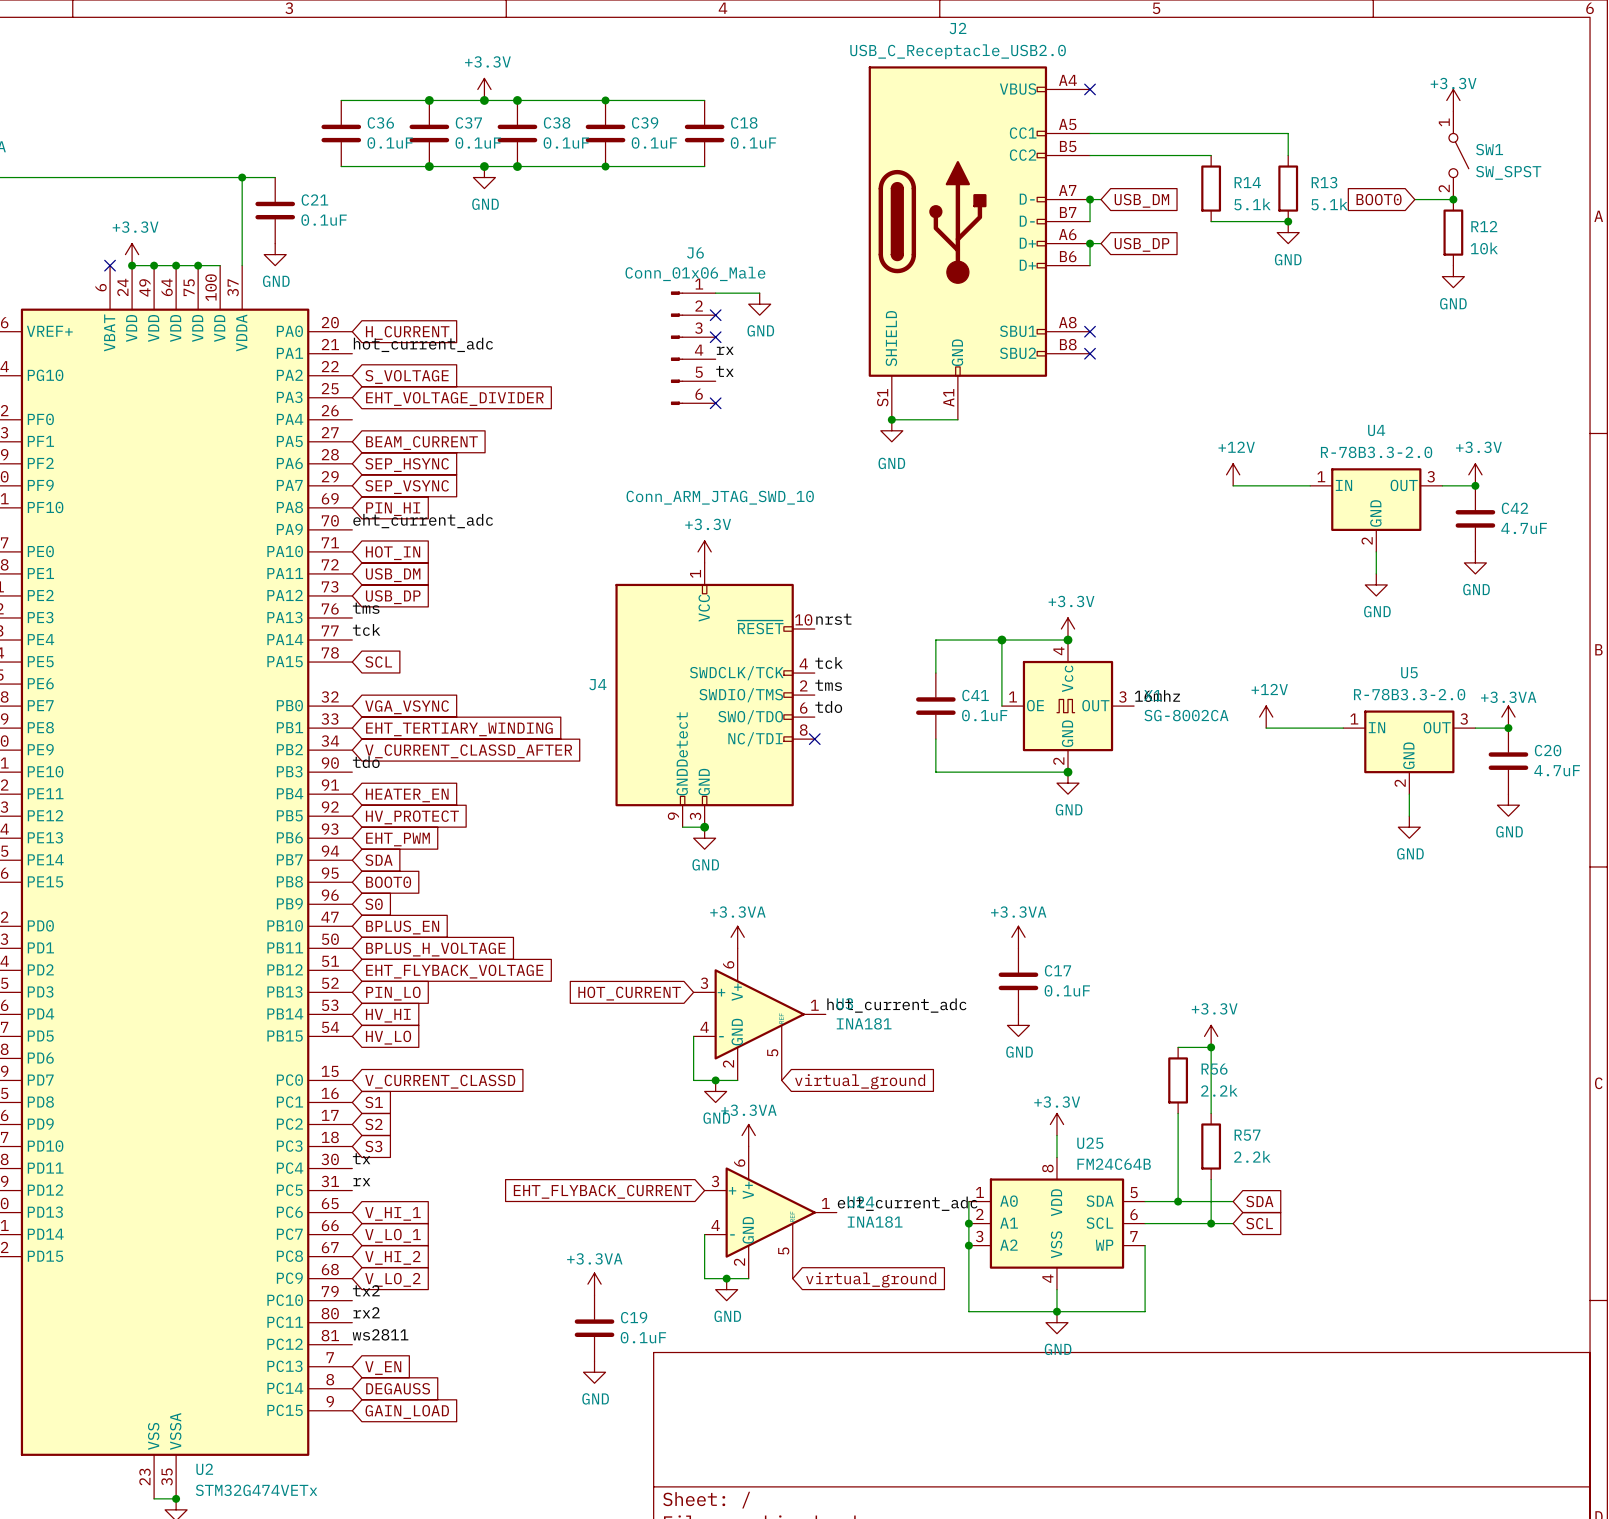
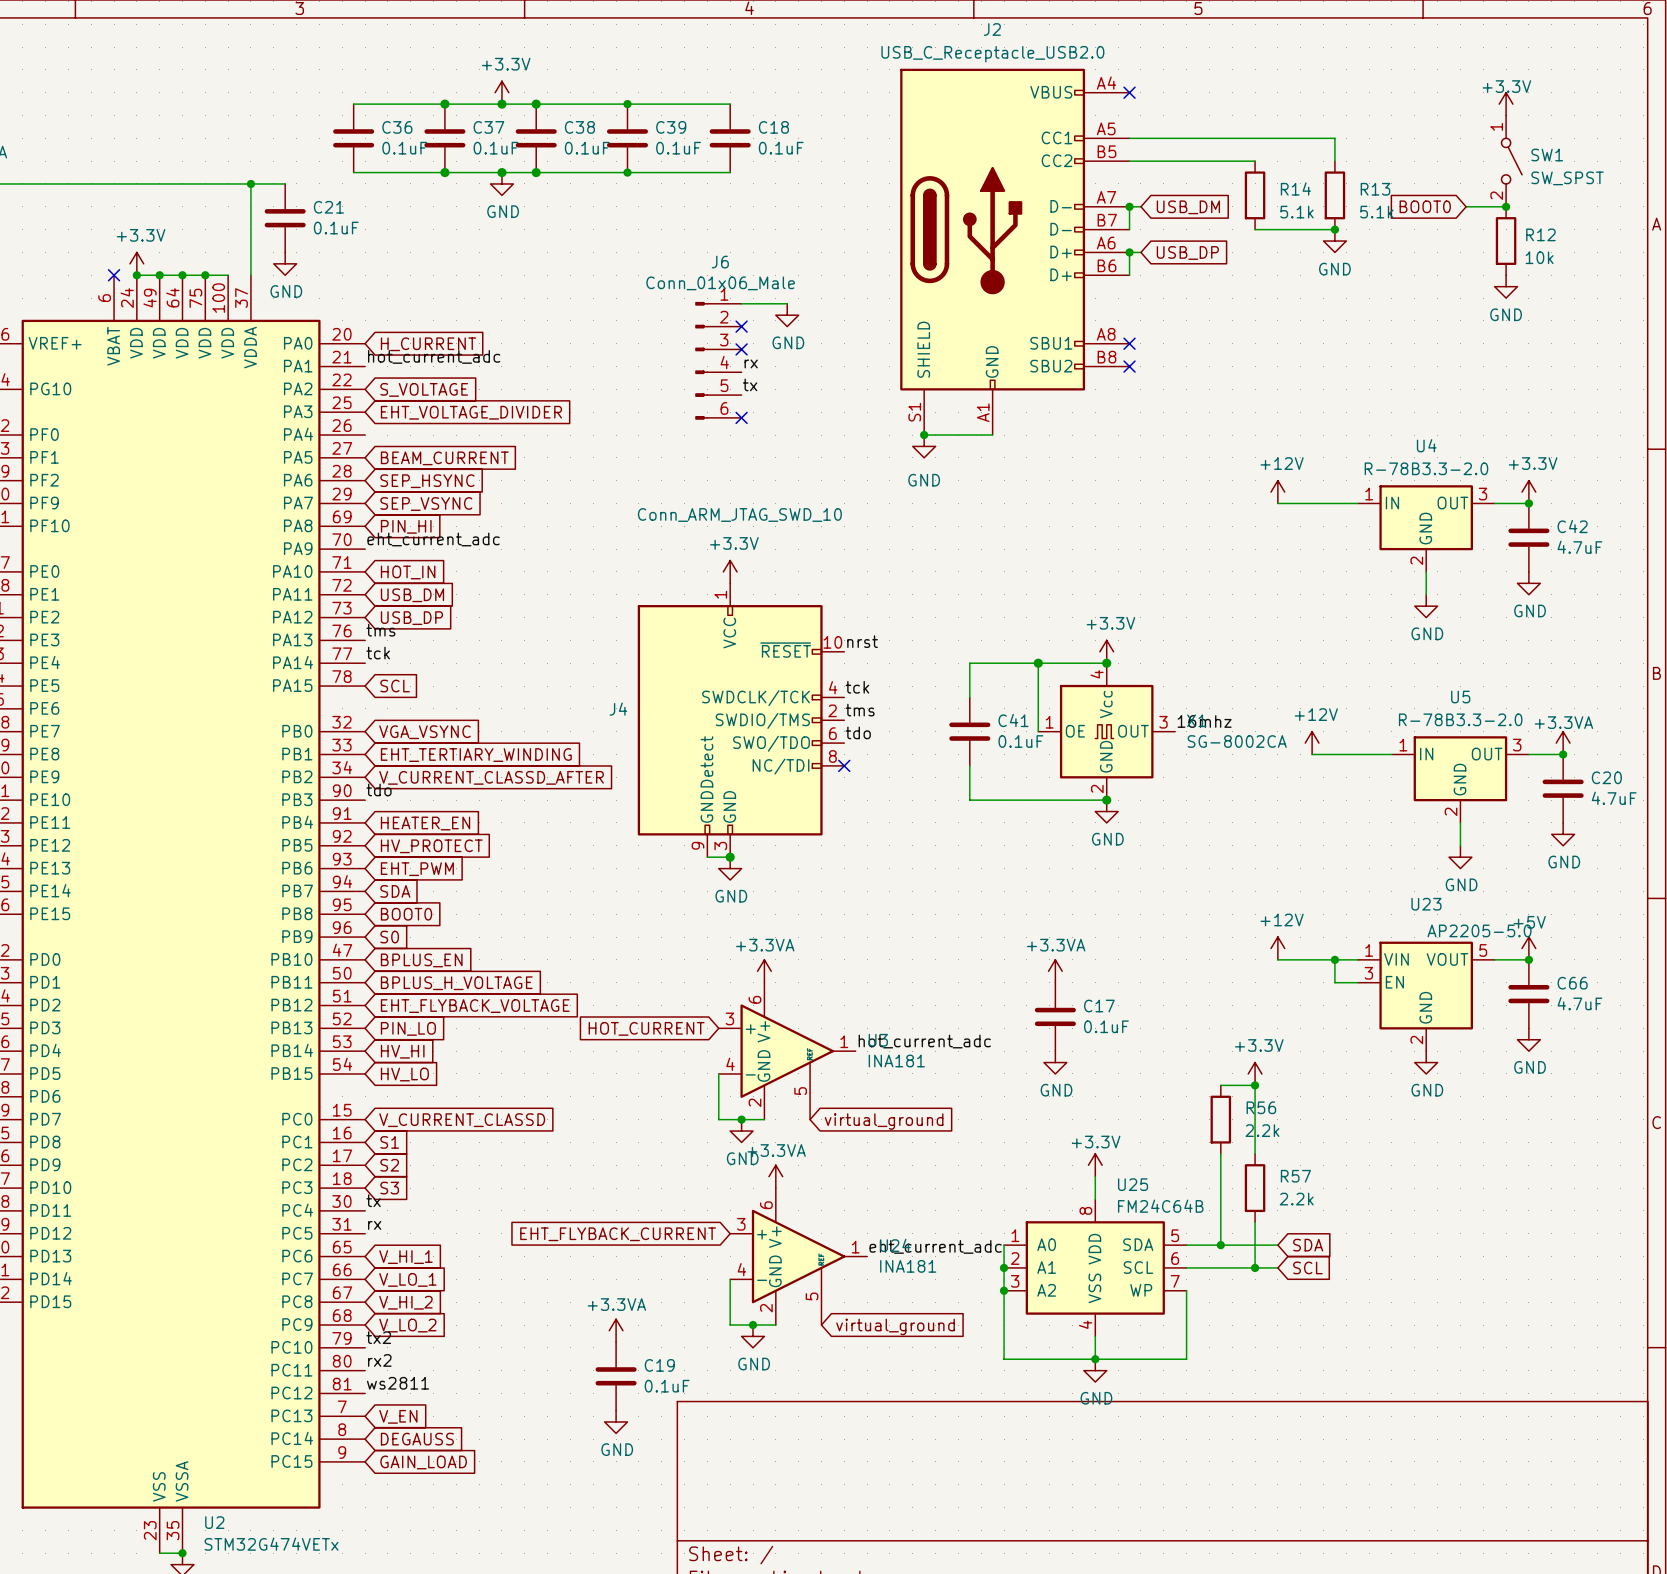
power symbol: none -> +12V (1277, 948)
power symbol: none -> +5V (1528, 948)
wire: none -> (1277, 959) (1357, 959)
wire: none -> (1334, 959) (1334, 982) (1357, 982)
junction: none -> (1334, 959)
wire: none -> (1494, 959) (1528, 959)
junction: none -> (1528, 959)
C66: none -> 4.7uF (1528, 994)
U23: none -> AP2205-5.0 (1426, 996)
power symbol: none -> GND (1528, 1039)
power symbol: none -> GND (1426, 1062)

